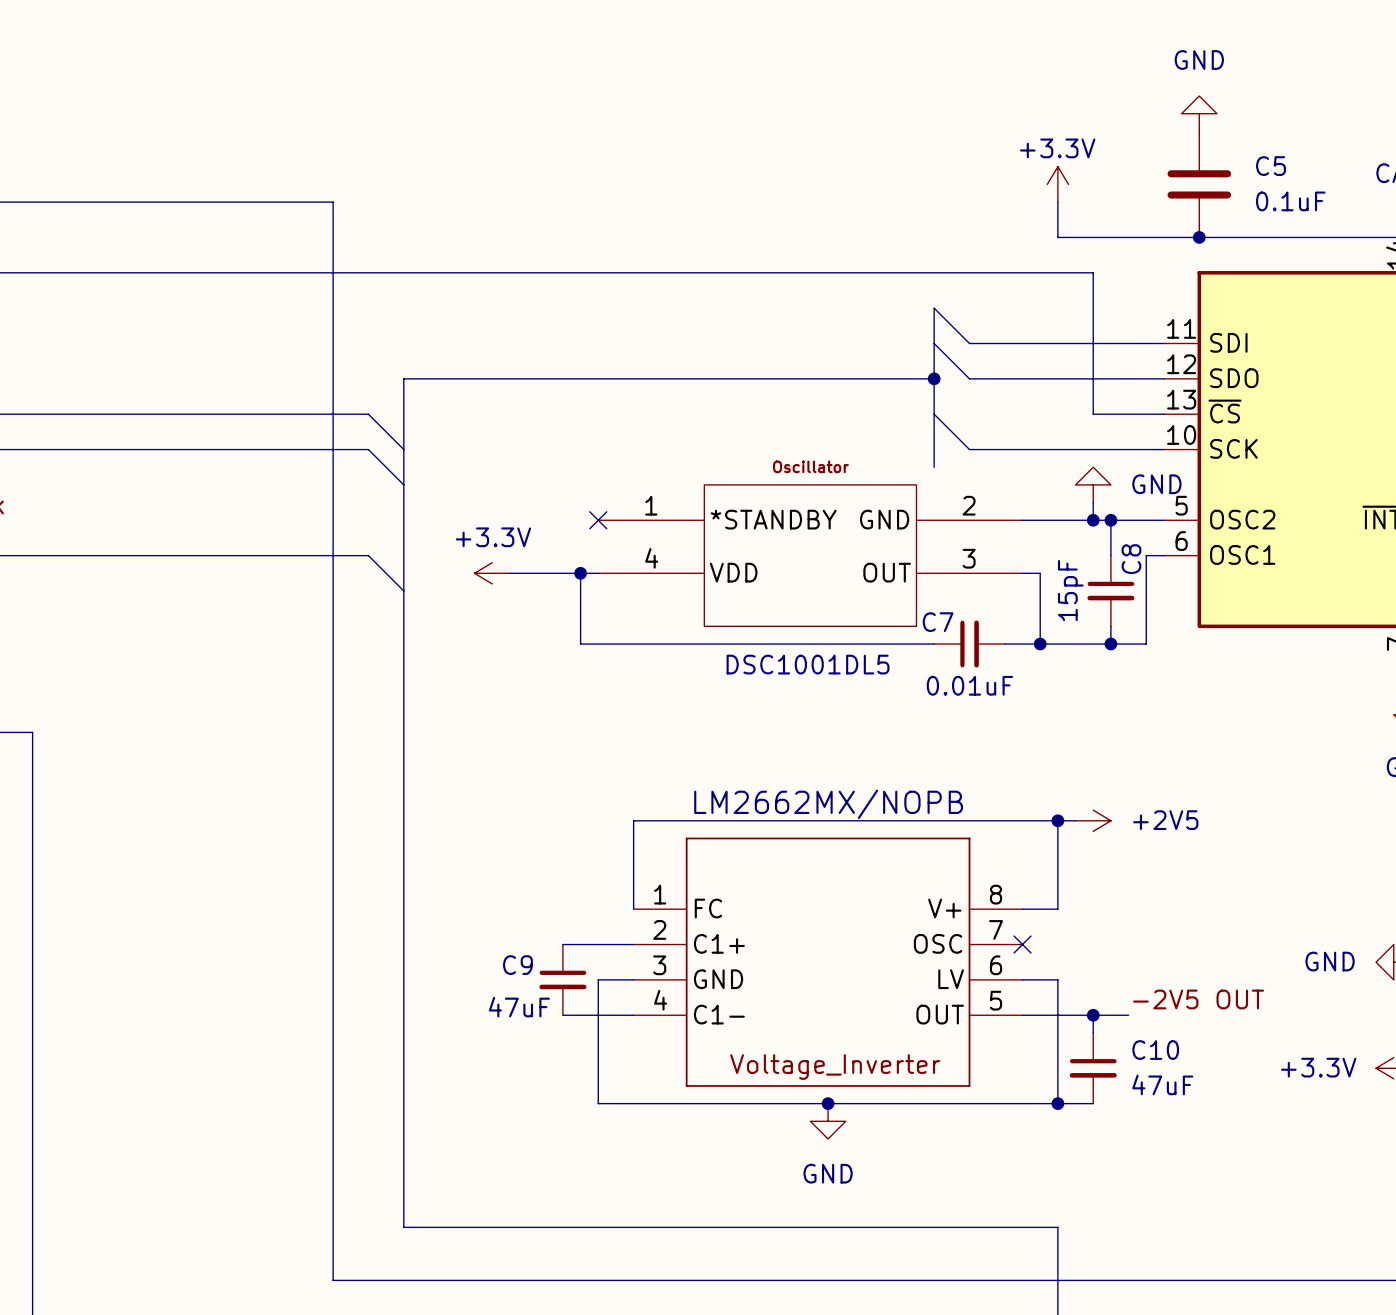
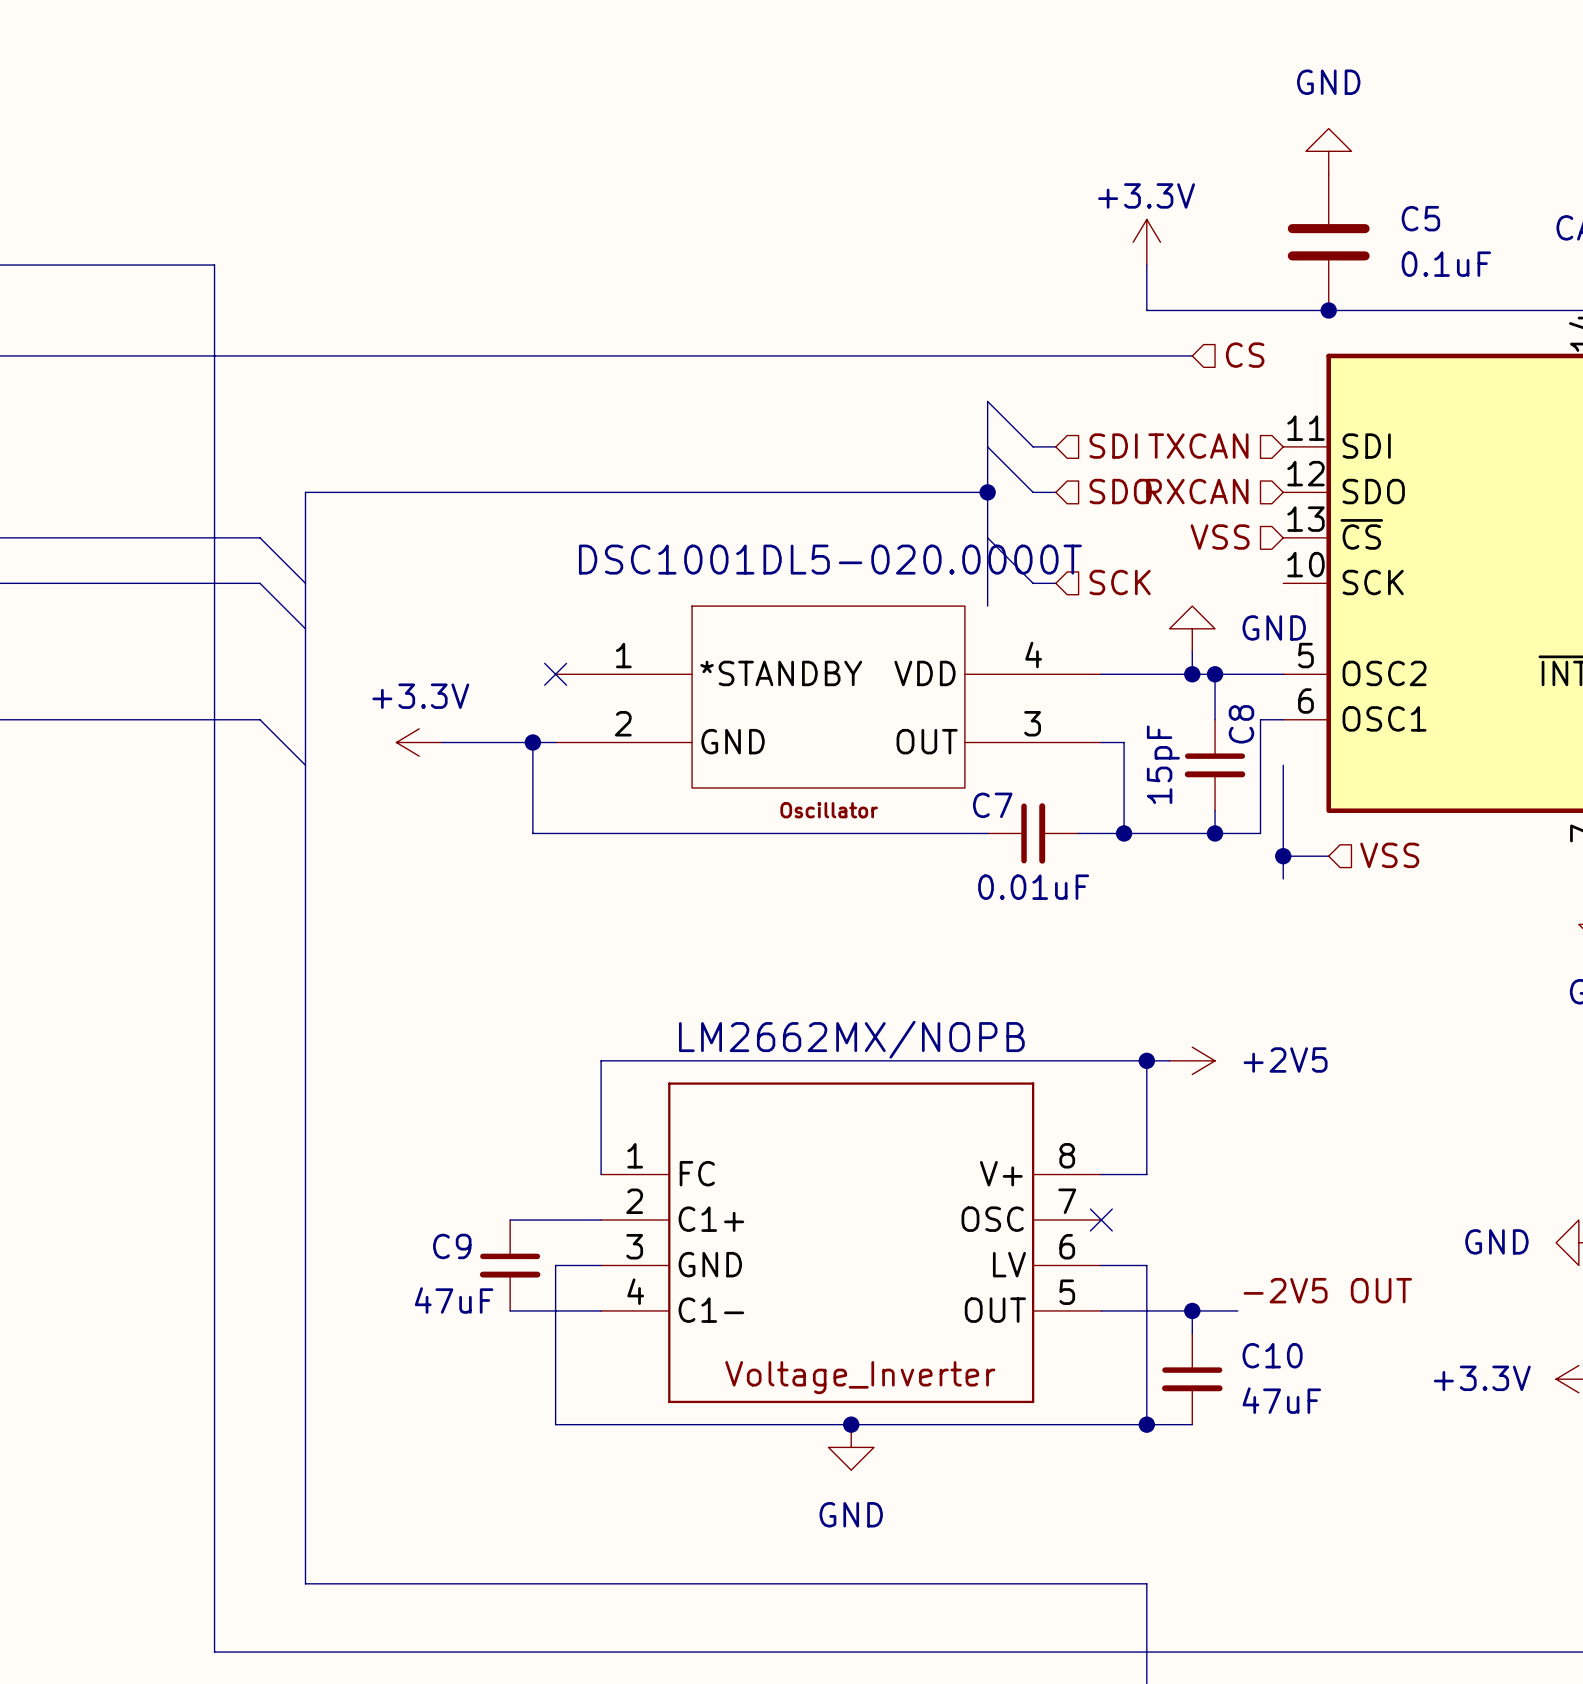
wire: (1093, 272) (1093, 414) (1163, 414) -> none
hierarchical label: none -> CS (1245, 355)
hierarchical label: none -> SDI (1113, 446)
hierarchical label: none -> TXCAN (1198, 446)
wire: (987, 343) (1163, 343) -> none
wire: (987, 378) (1163, 378) -> none
hierarchical label: none -> SDO (1120, 491)
hierarchical label: none -> RXCAN (1197, 491)
hierarchical label: none -> VSS (1220, 537)
hierarchical label: none -> SCK (1120, 582)
wire: (987, 449) (1163, 449) -> none
part: none -> DSC1001DL5-020.0000T (828, 697)
part: DSC1001DL5 (810, 555) -> none
wire: none -> (1283, 765) (1283, 878)
wire: none -> (1283, 856) (1328, 856)
junction: none -> (1283, 856)
hierarchical label: none -> VSS (1389, 855)

